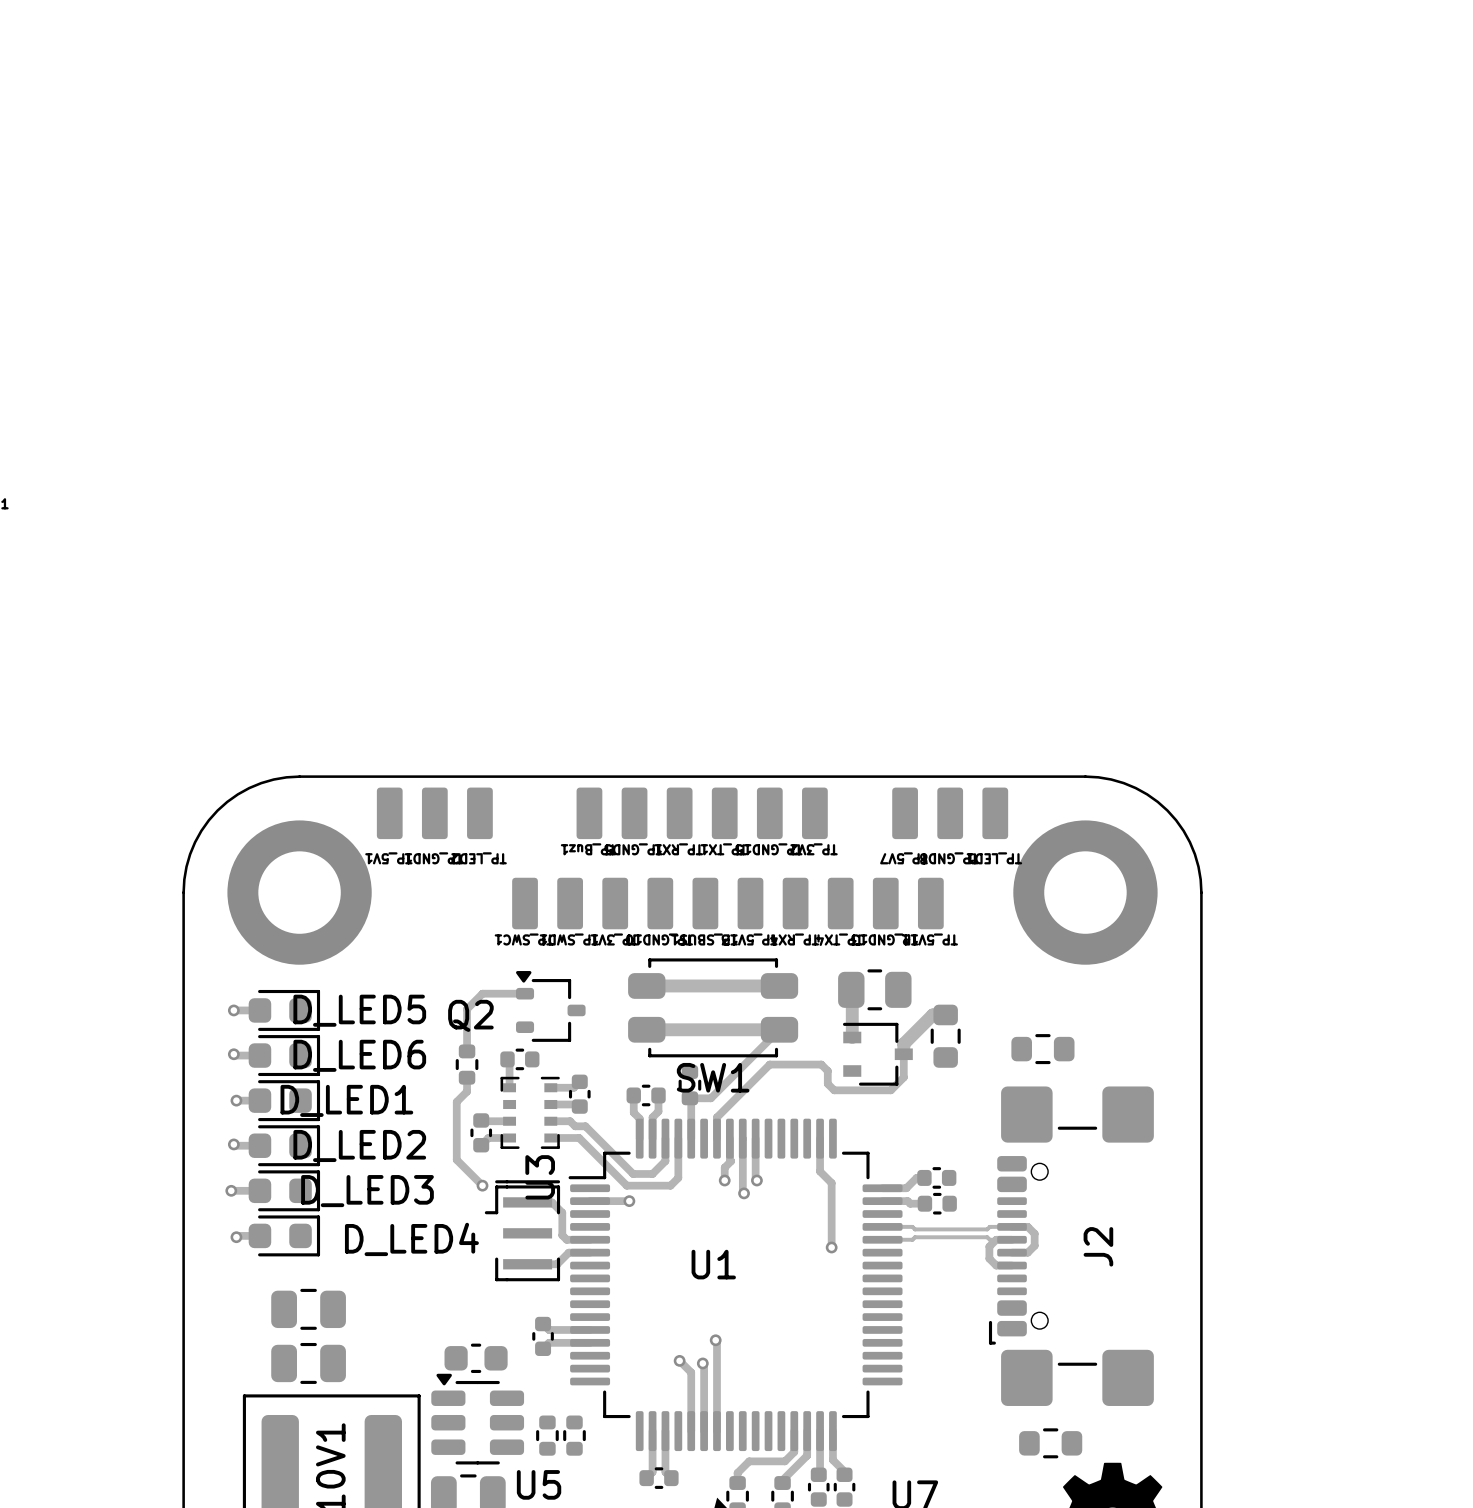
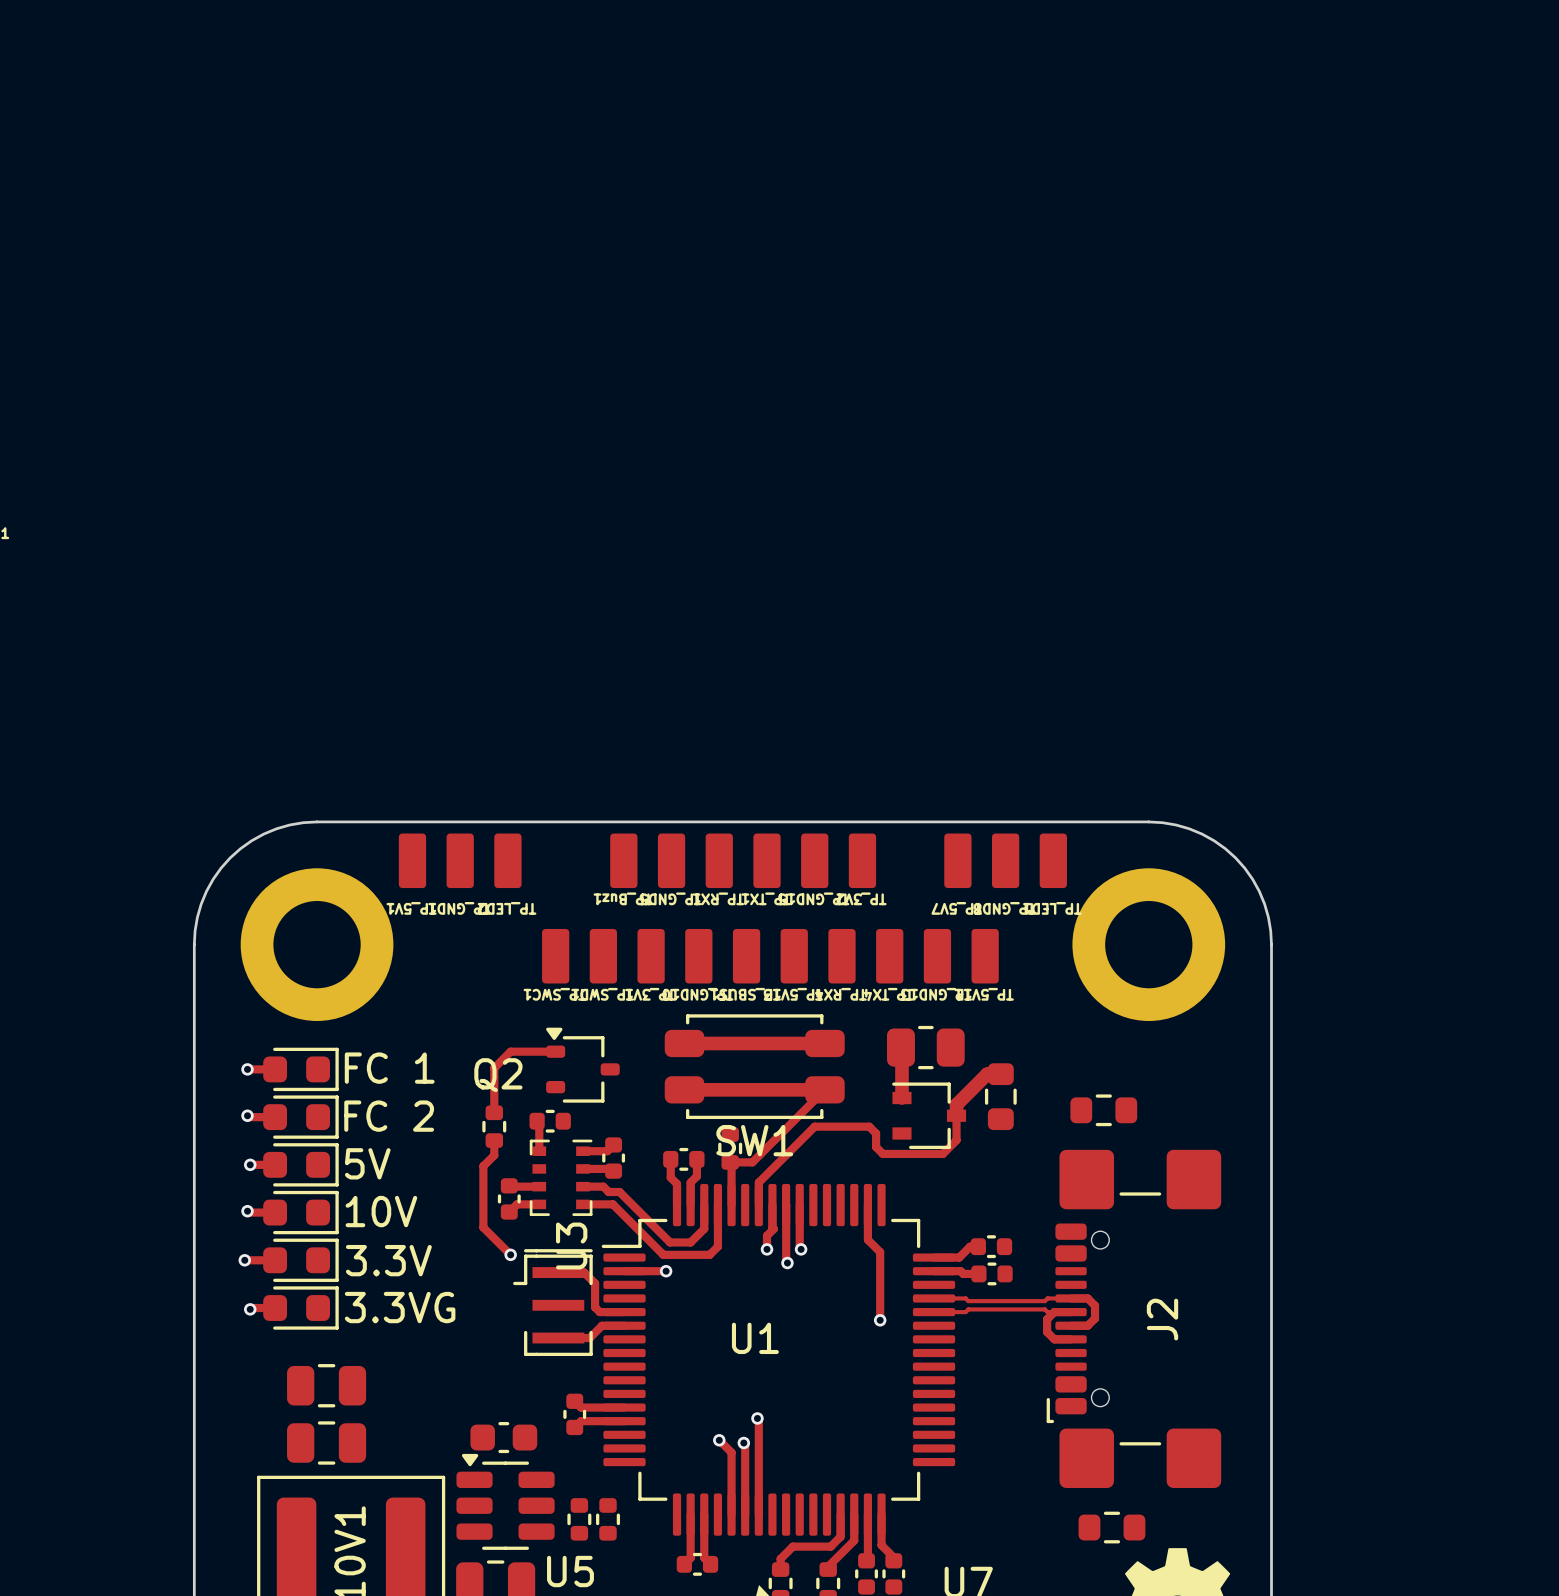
D_LED5 name: D_LED5 (359, 1010) -> FC 1 (389, 1068)
D_LED6 name: D_LED6 (359, 1055) -> FC 2 (389, 1116)
D_LED1 name: D_LED1 (346, 1100) -> 5V (367, 1163)
D_LED2 name: D_LED2 (359, 1145) -> 10V (381, 1211)
D_LED3 name: D_LED3 (367, 1191) -> 3.3V (388, 1260)
D_LED4 name: D_LED4 (411, 1239) -> 3.3VG (400, 1307)

